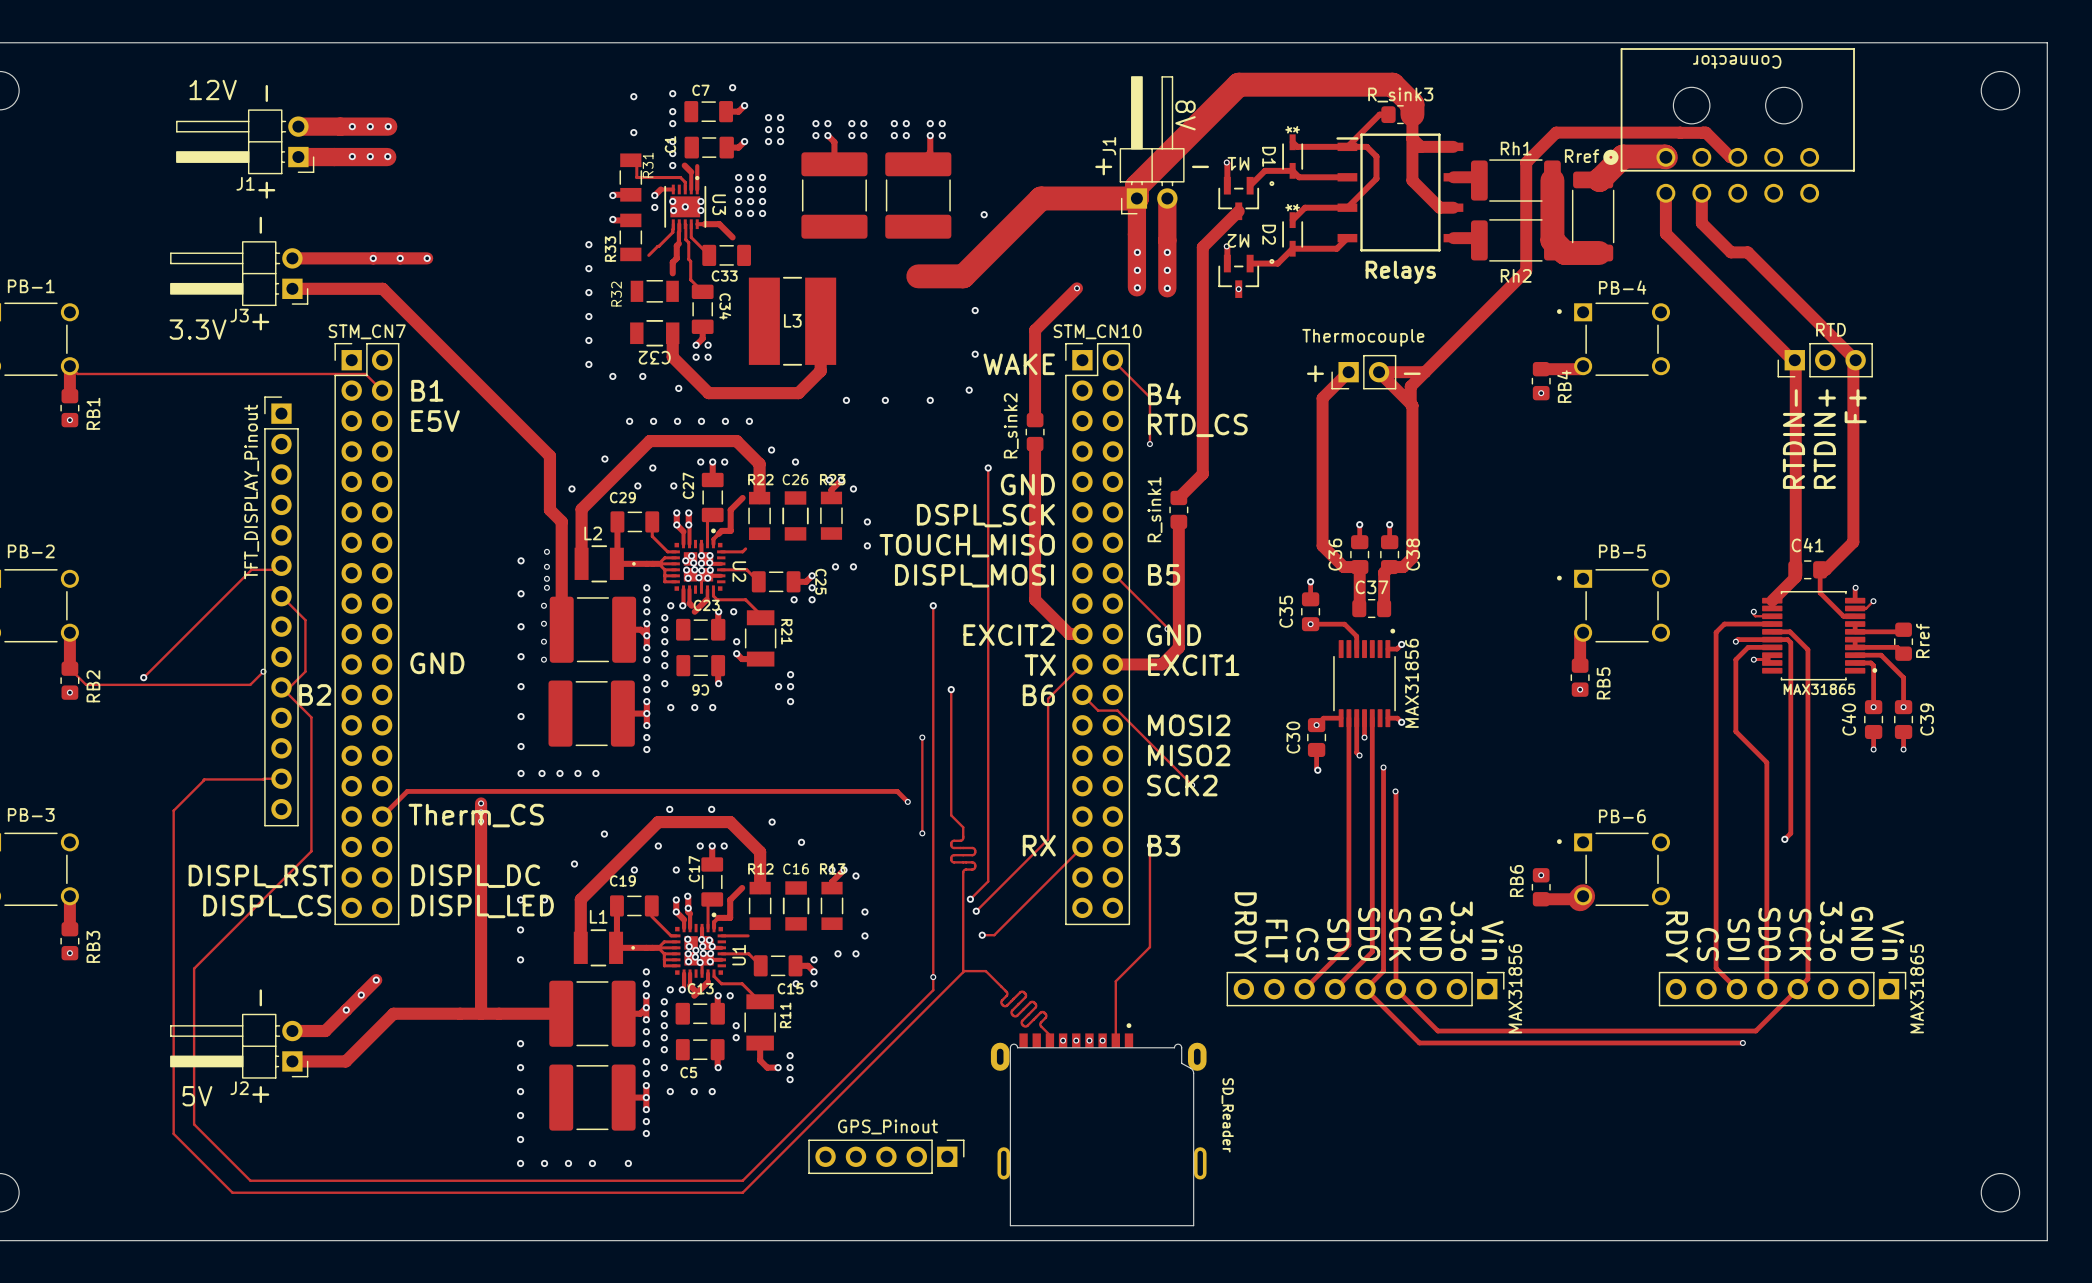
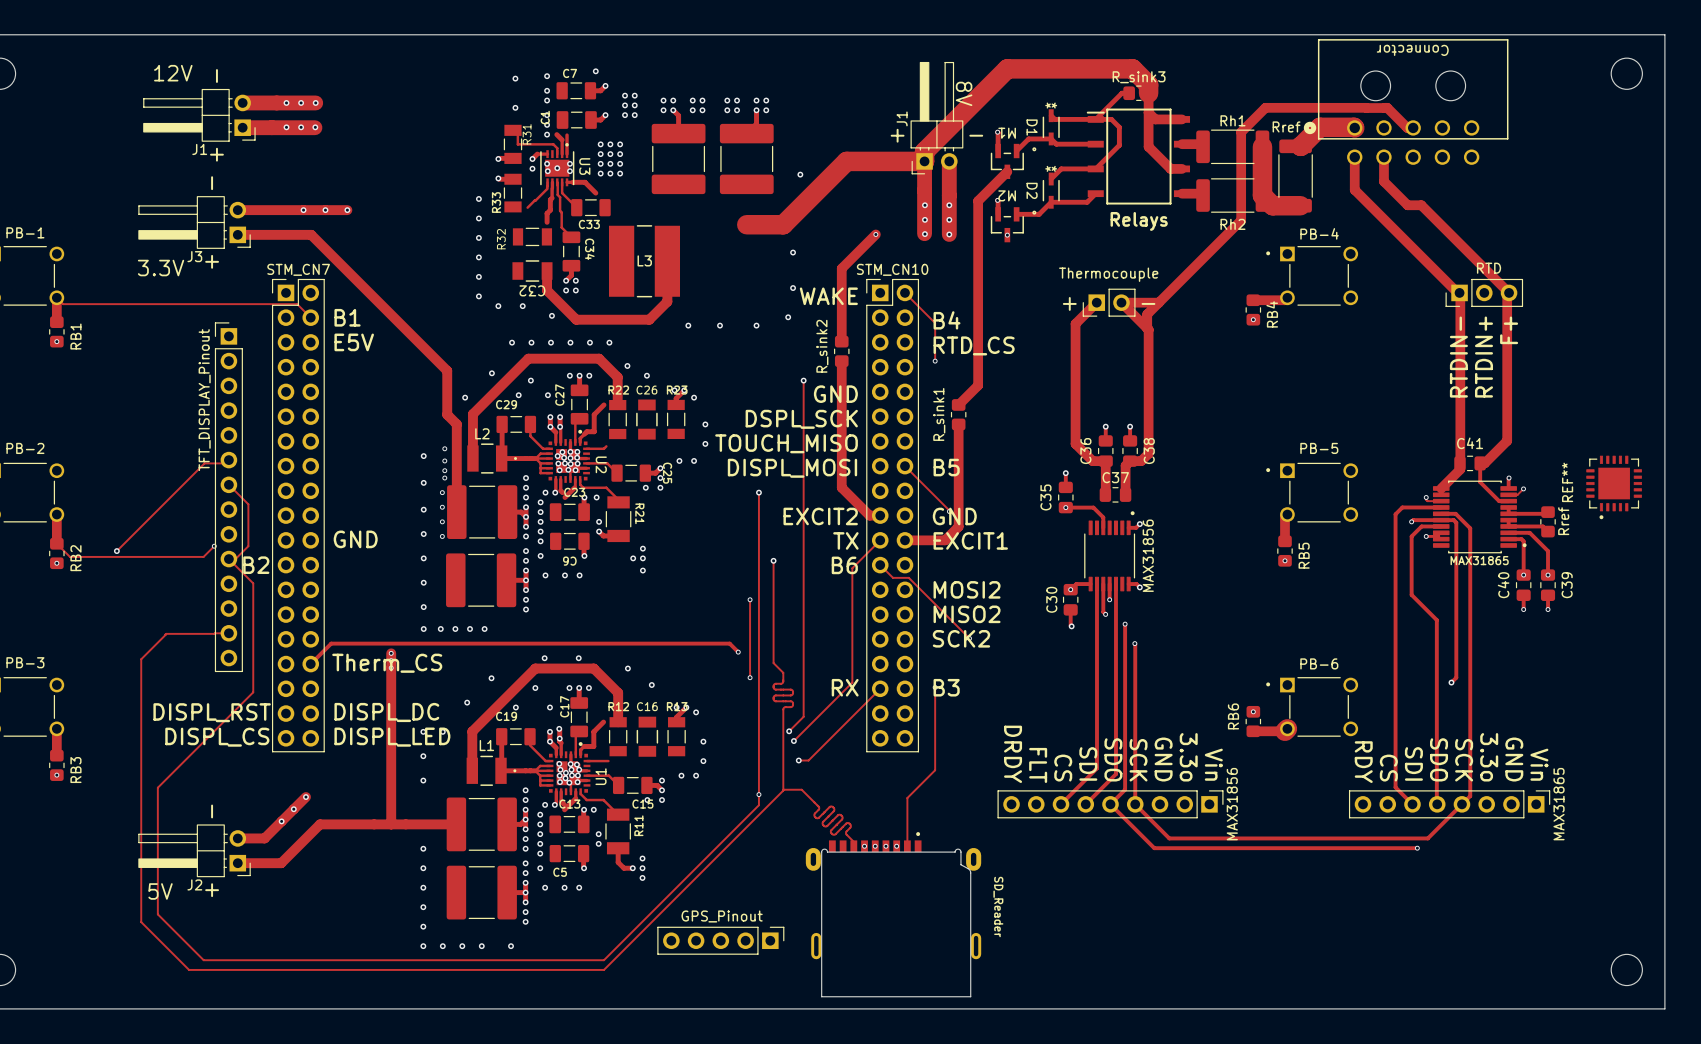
REF**: none -> (1614, 487)

